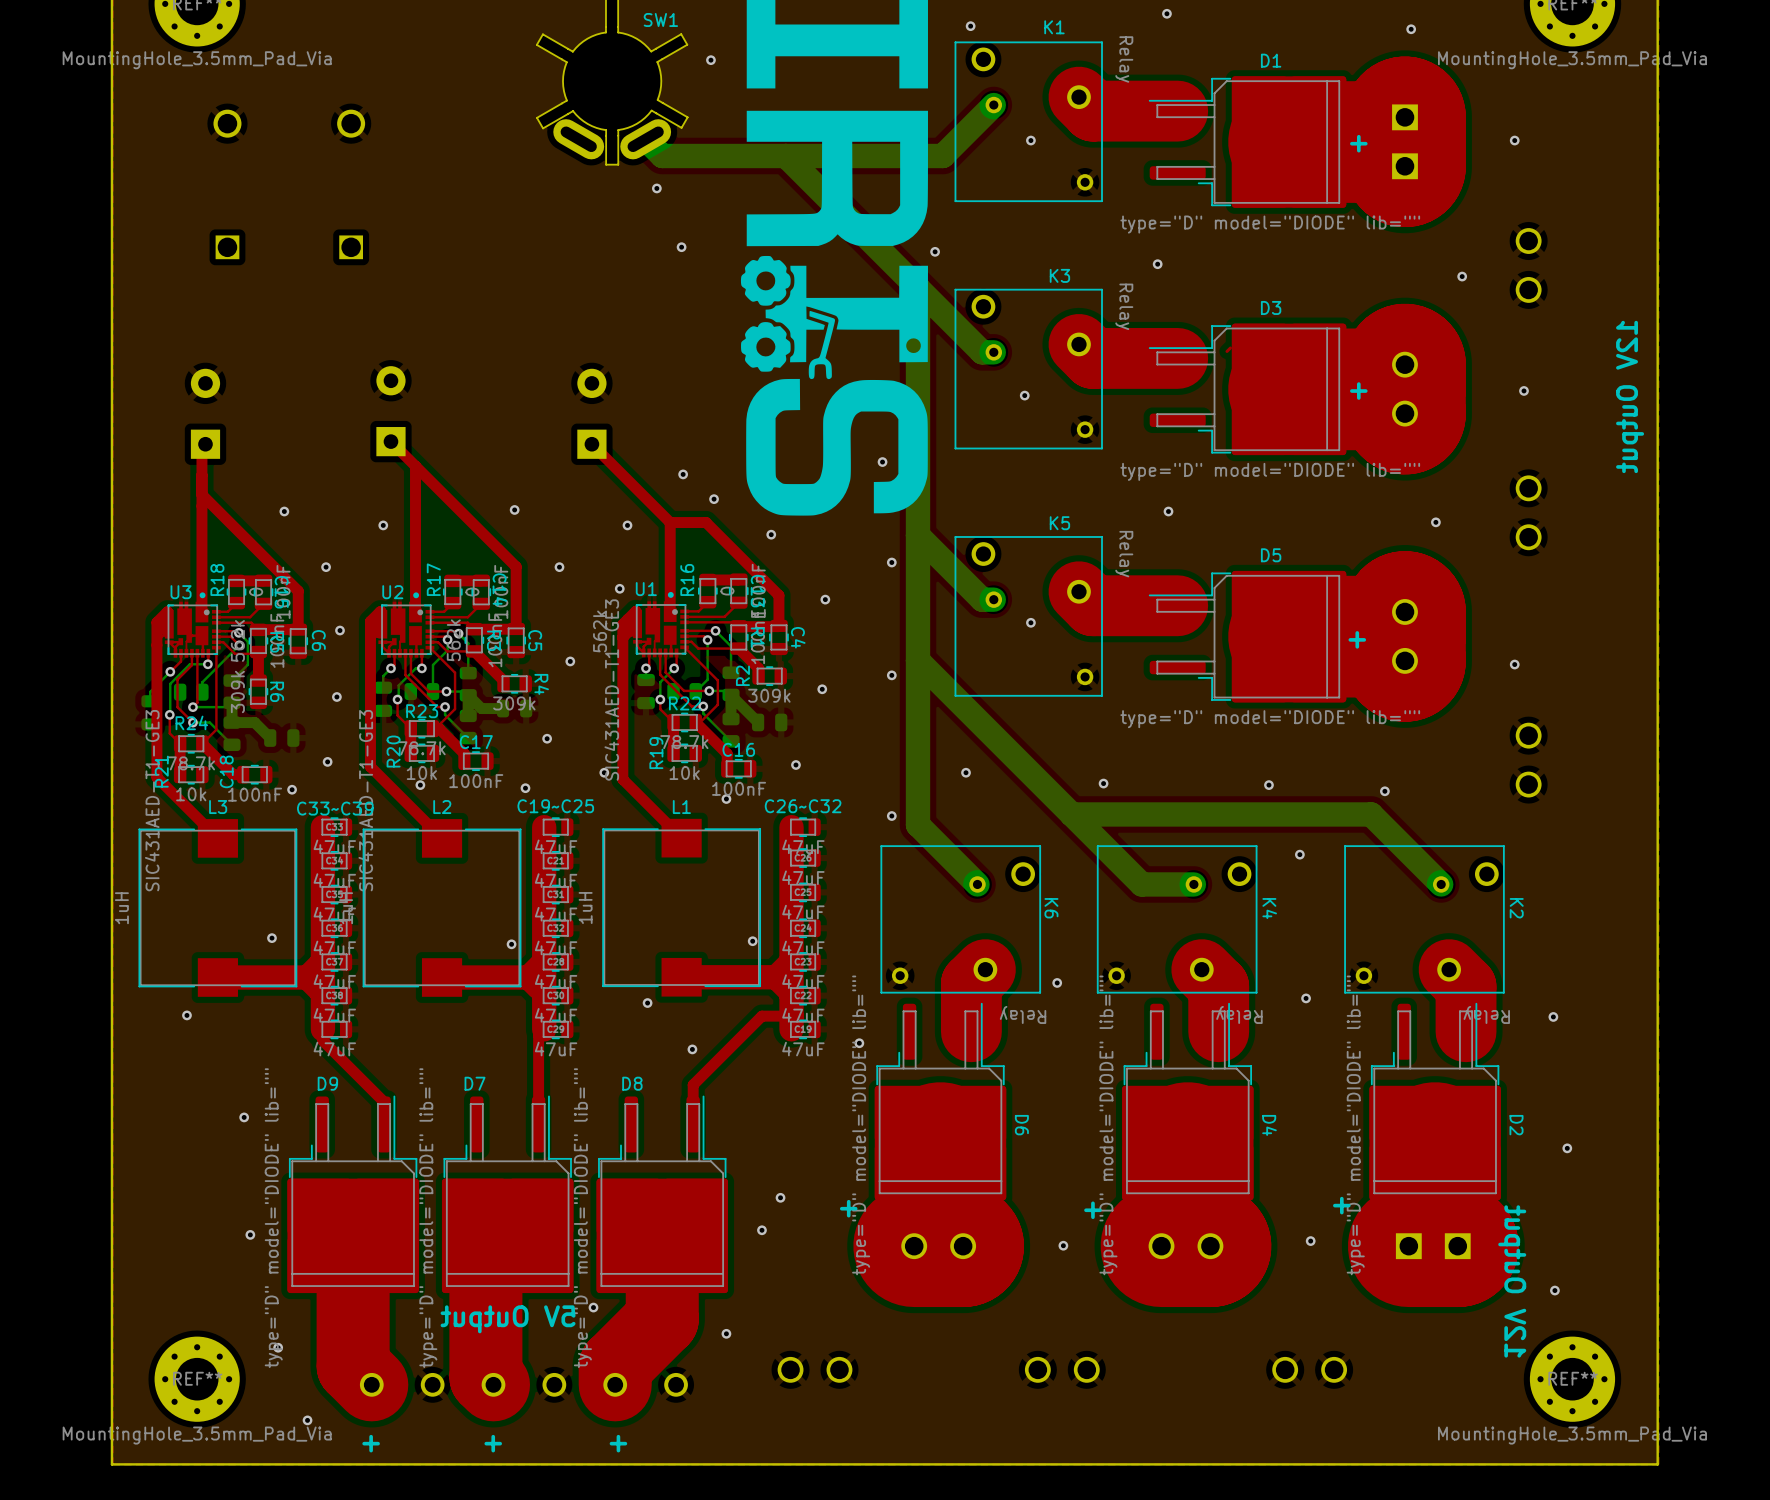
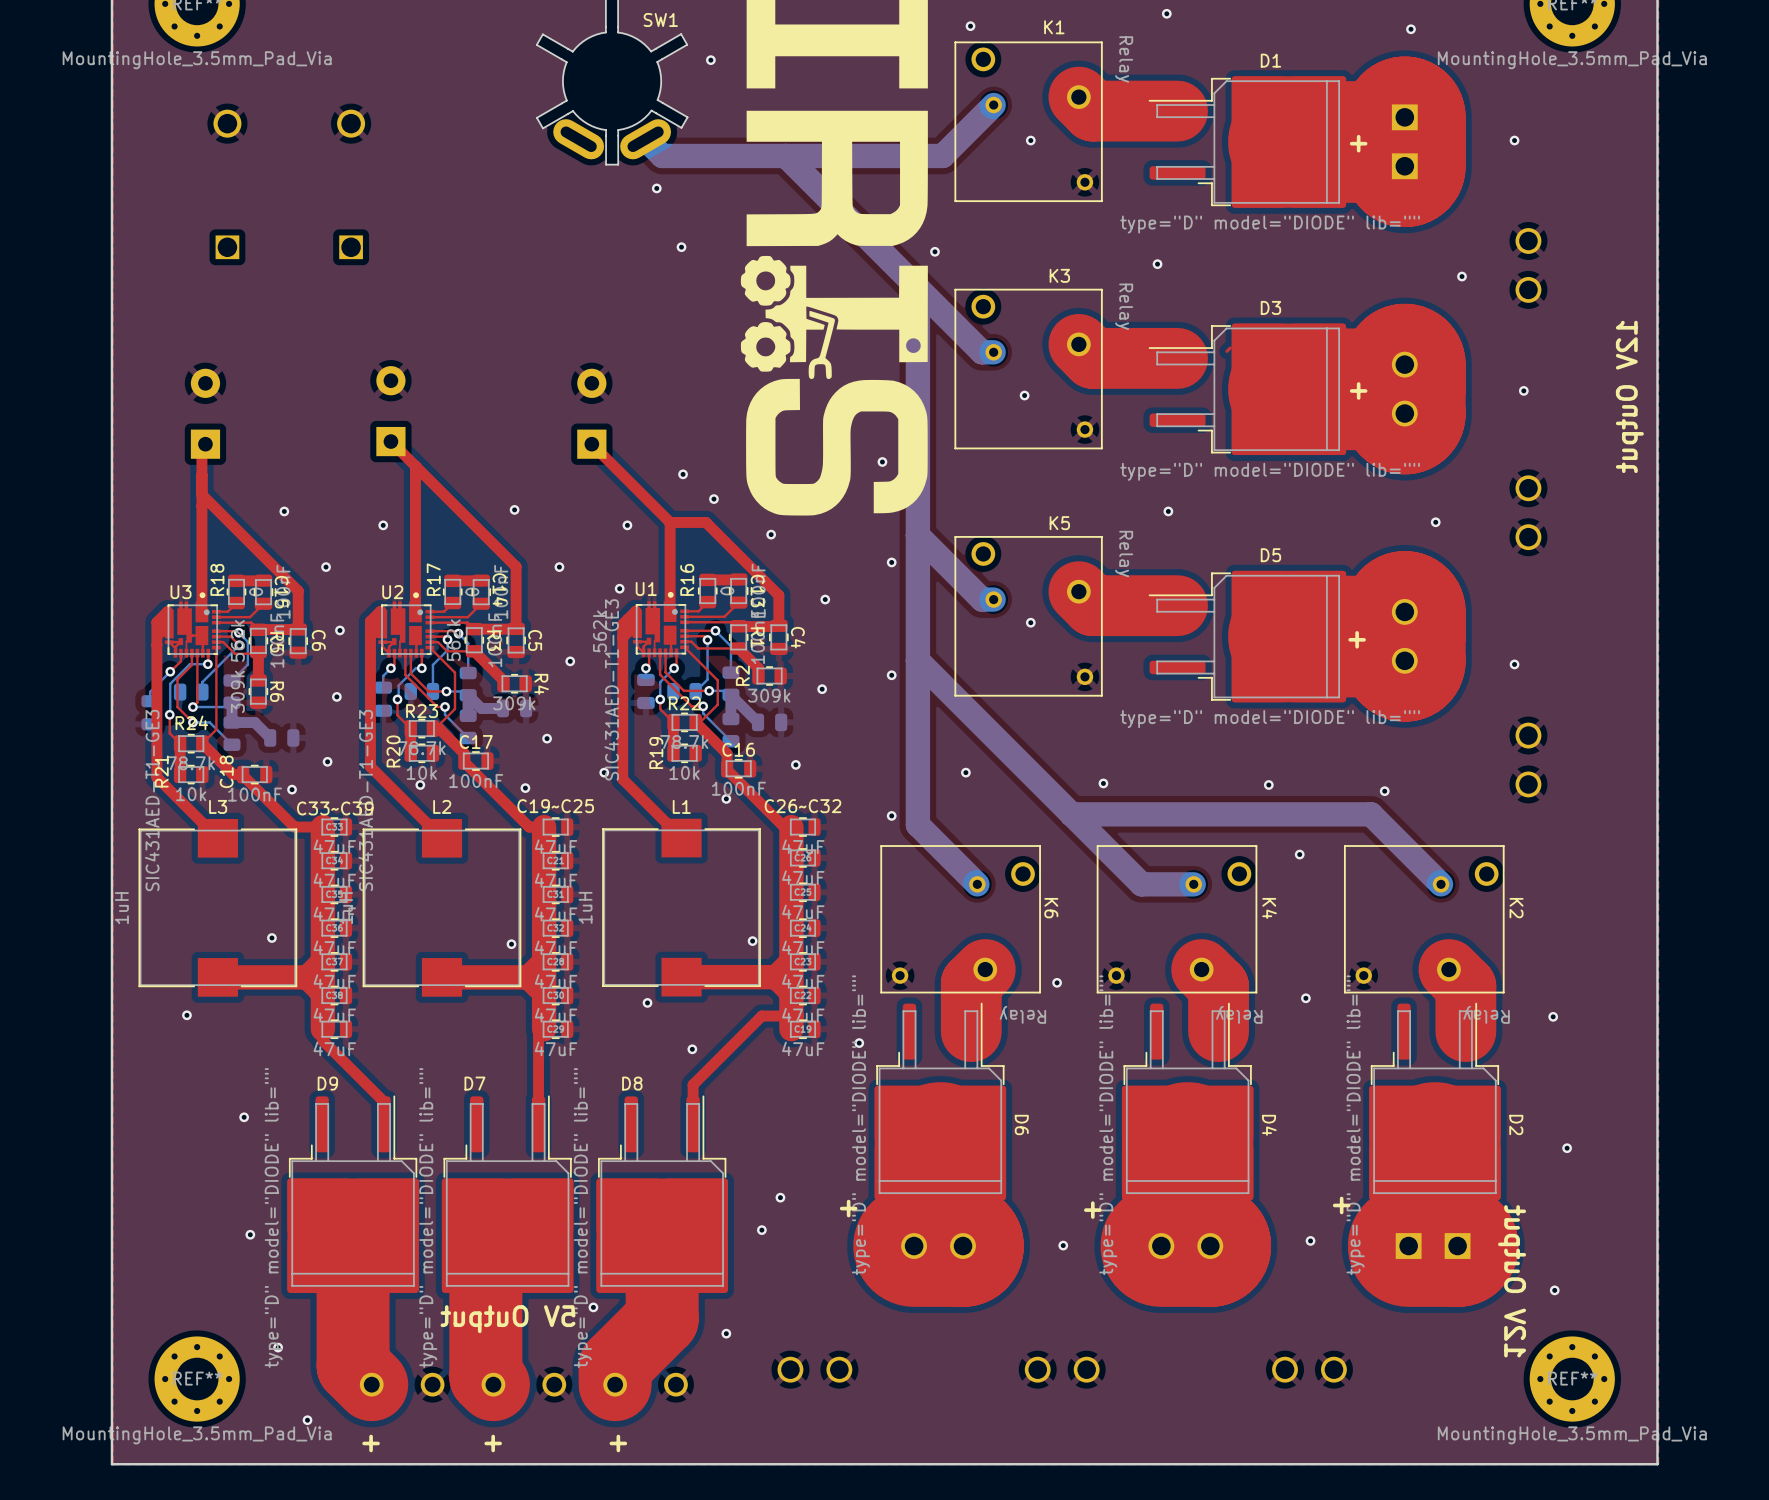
top track: none -> (464, 761) (529, 827) (544, 827)
top track: none -> (727, 768) (784, 827) (791, 827)
top track: none -> (243, 774) (294, 827) (322, 827)

